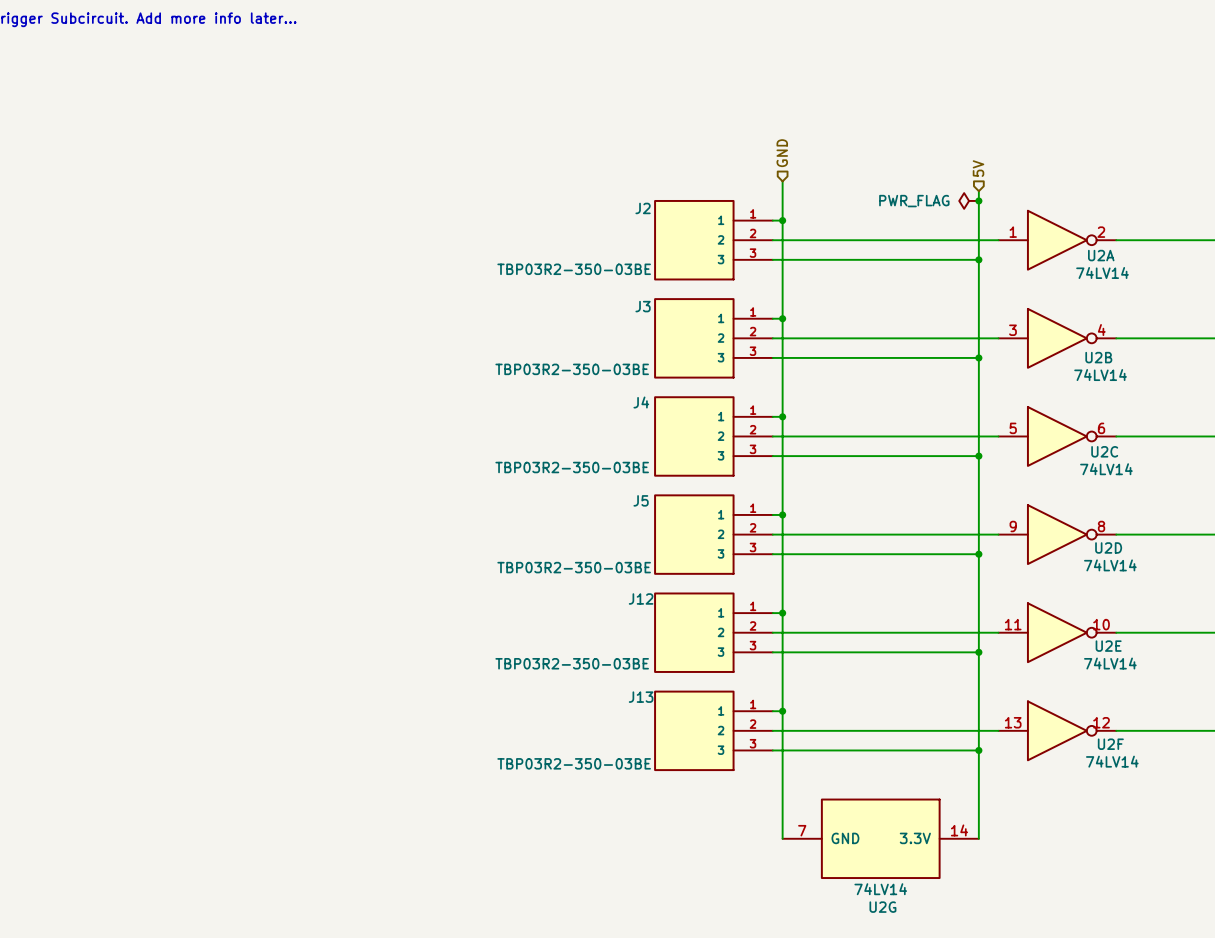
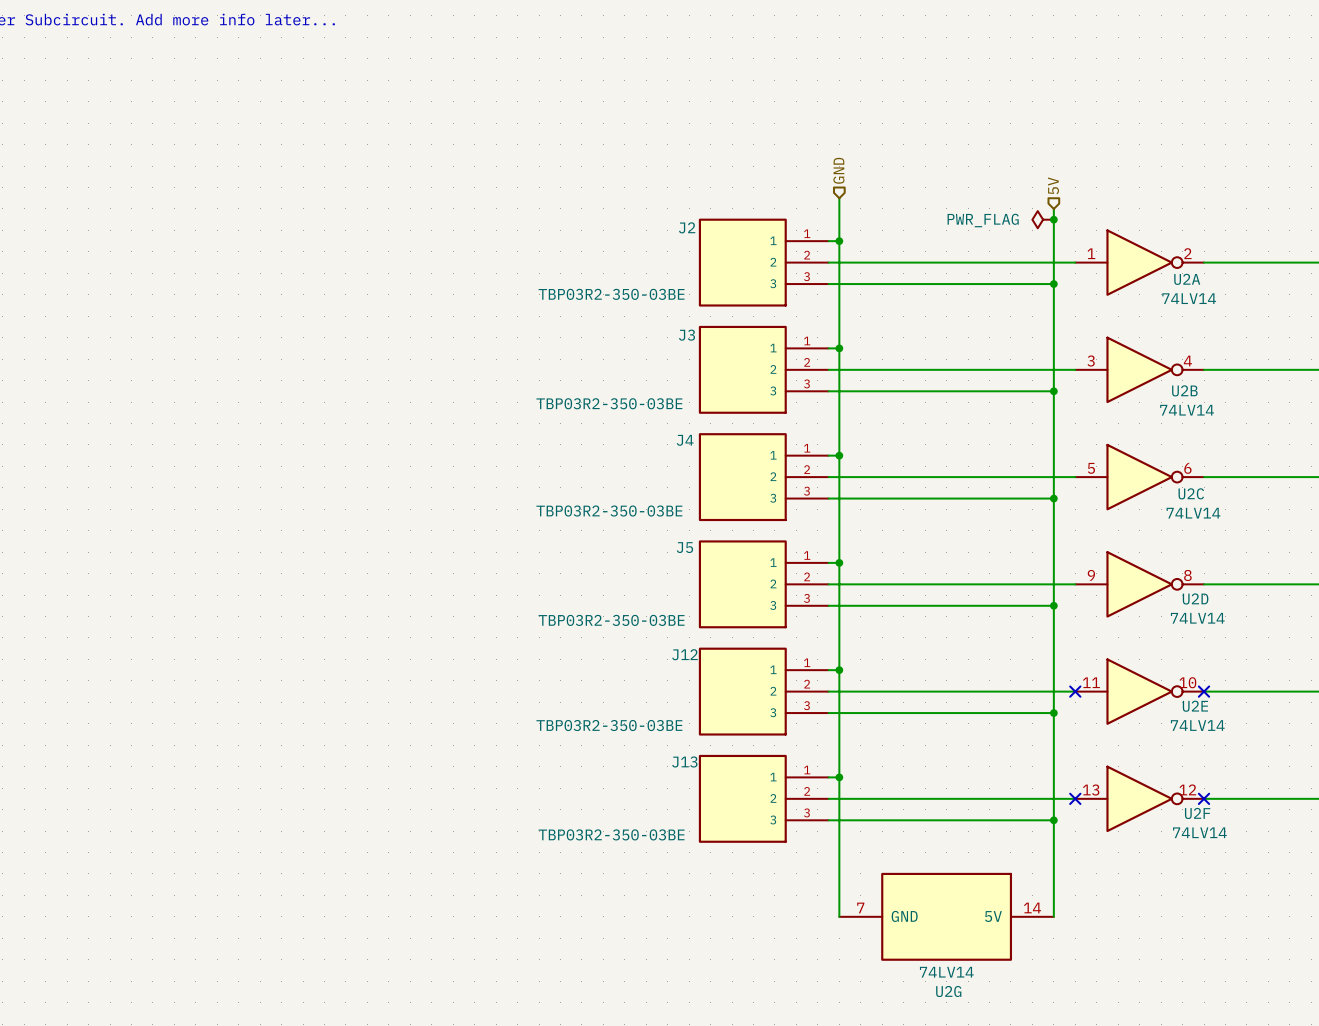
no-connect mark: none -> (1075, 691)
no-connect mark: none -> (1204, 691)
no-connect mark: none -> (1075, 798)
no-connect mark: none -> (1204, 798)
U2G pin name: 3.3V (915, 838) -> 5V (993, 916)

